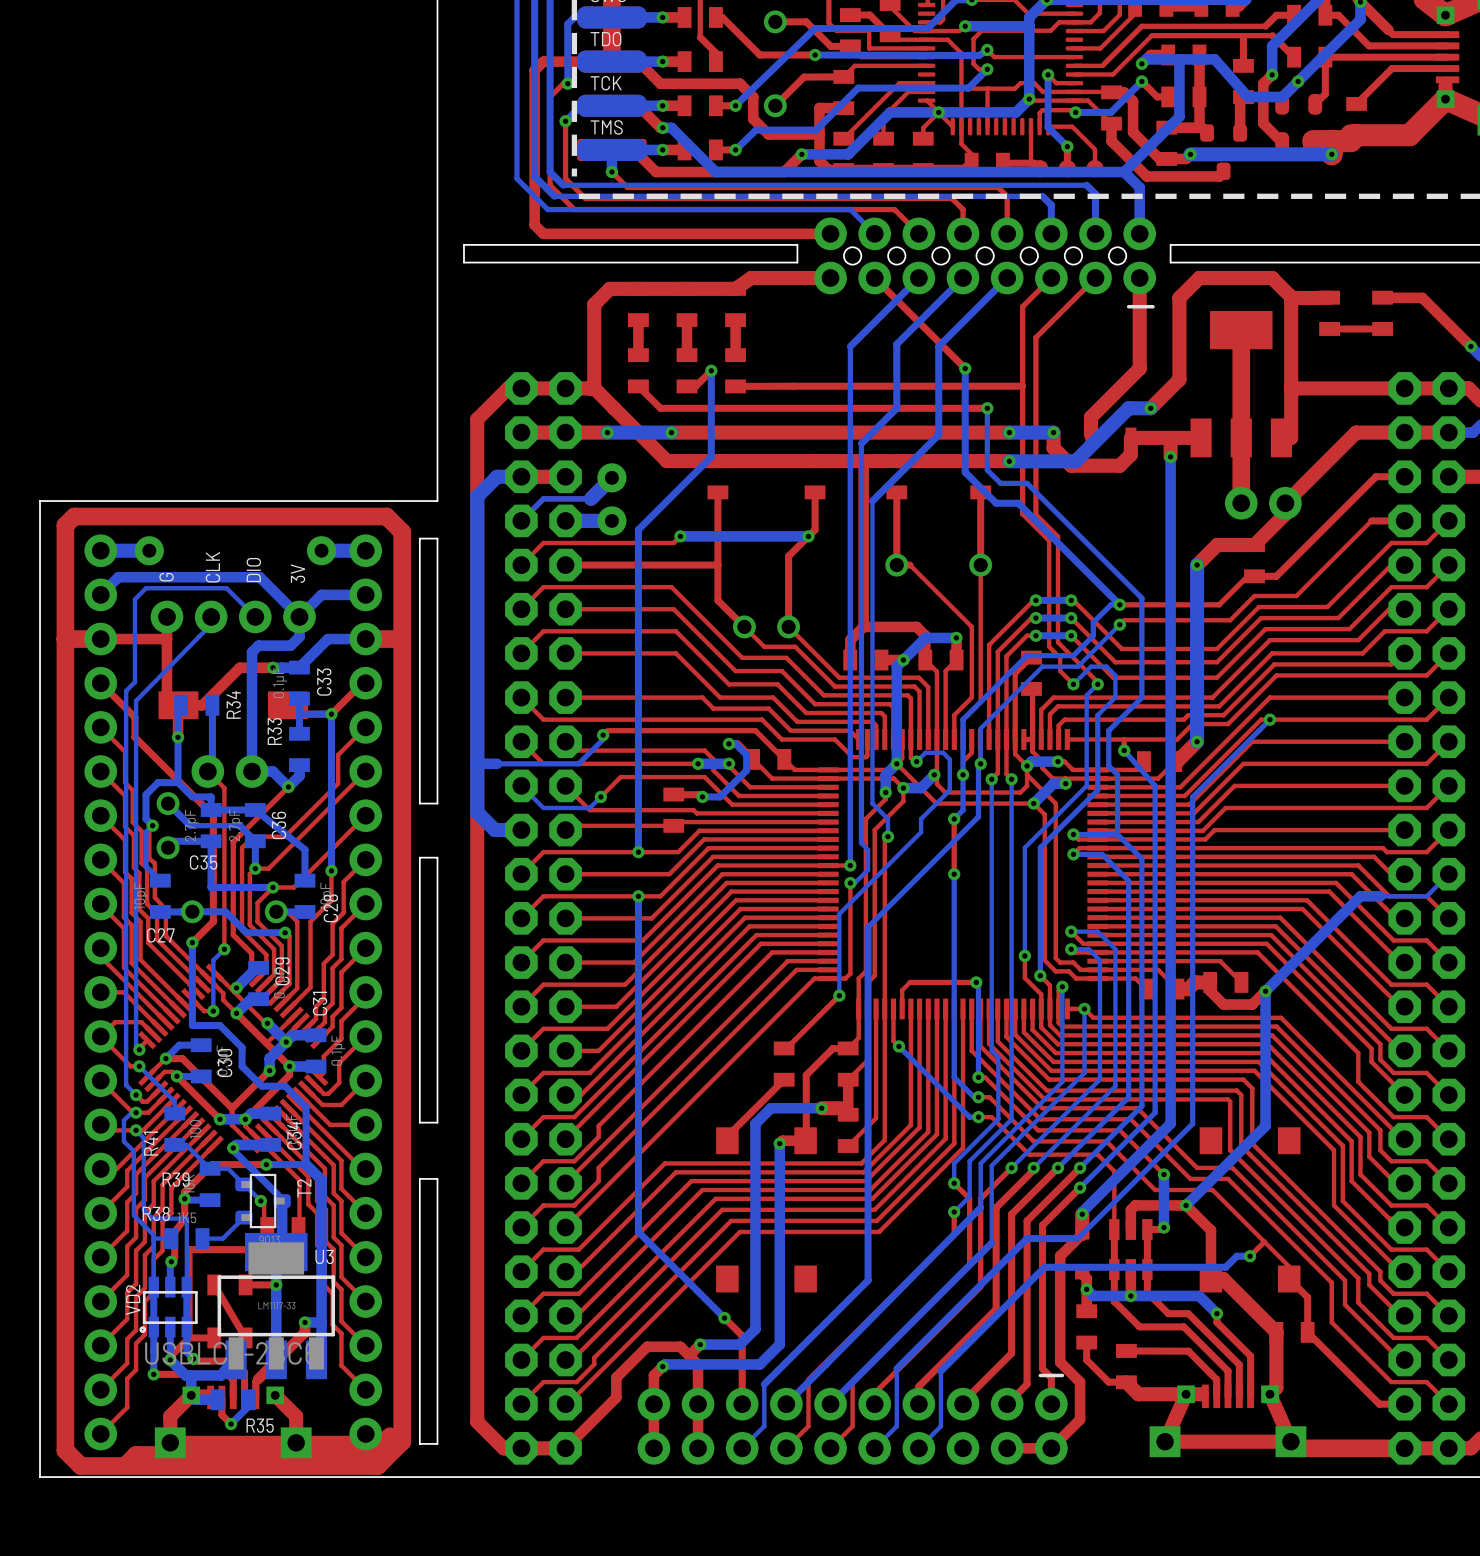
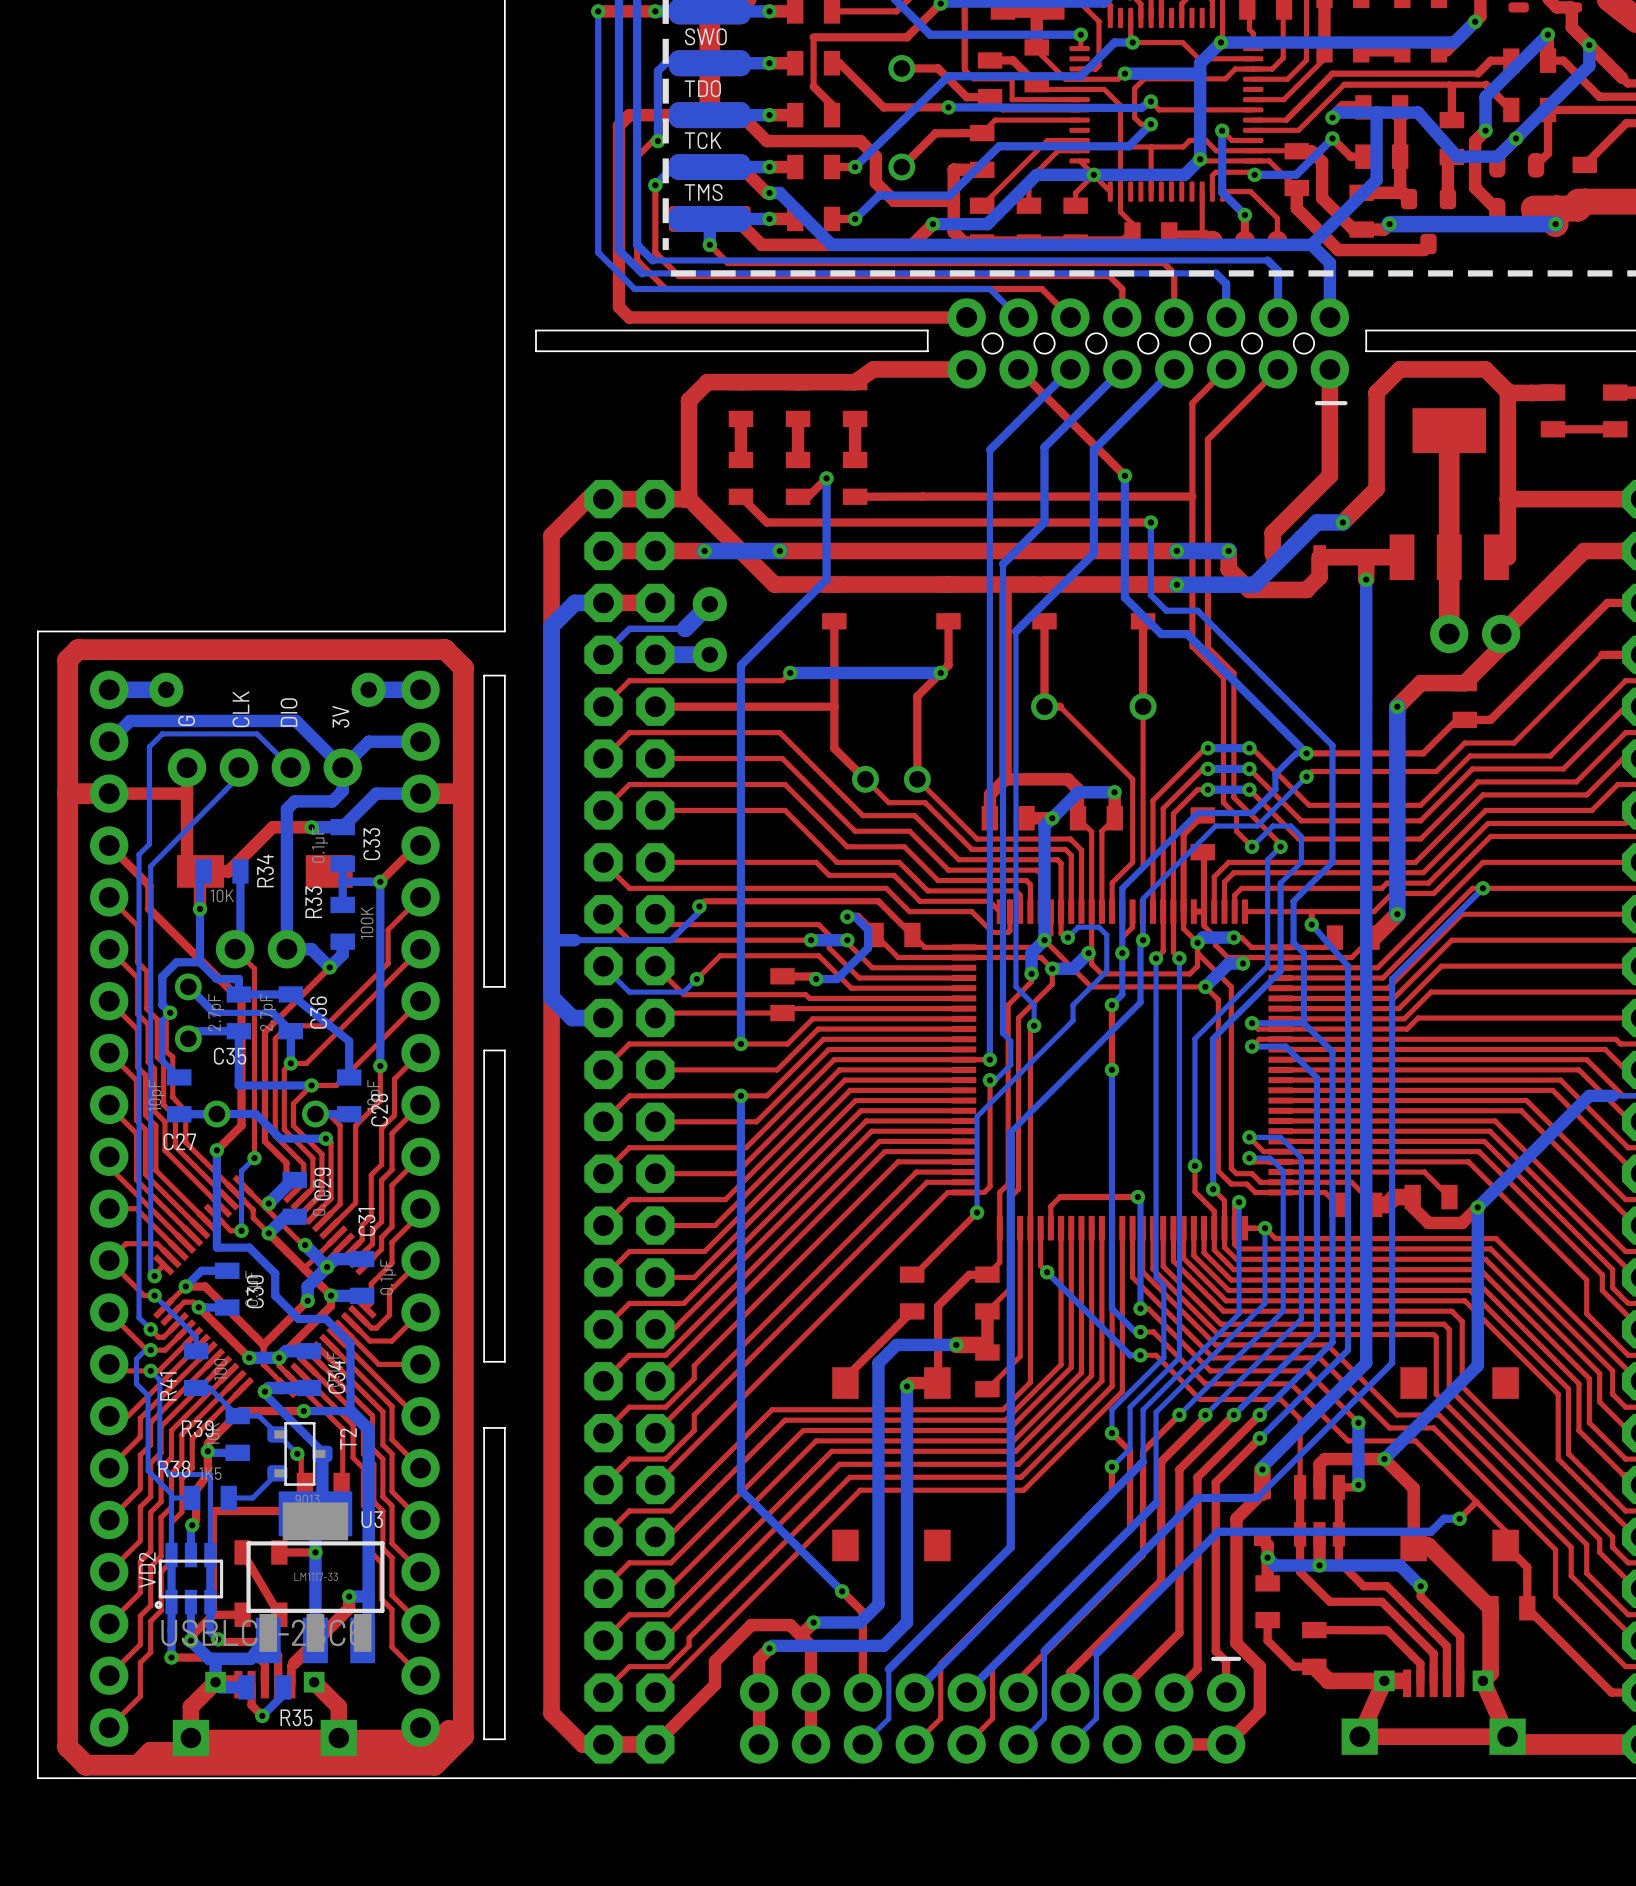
R34 value: none -> 10K (222, 895)
R33 value: none -> 100K (367, 923)

